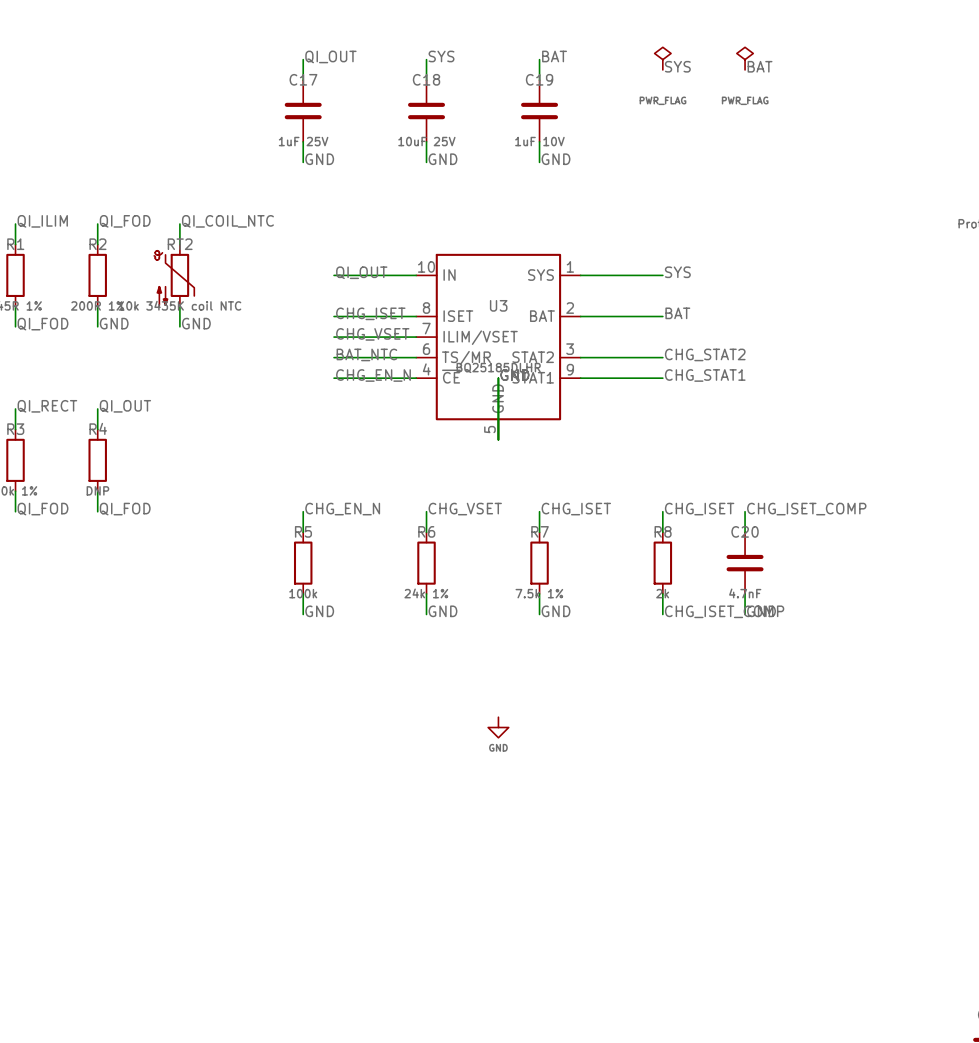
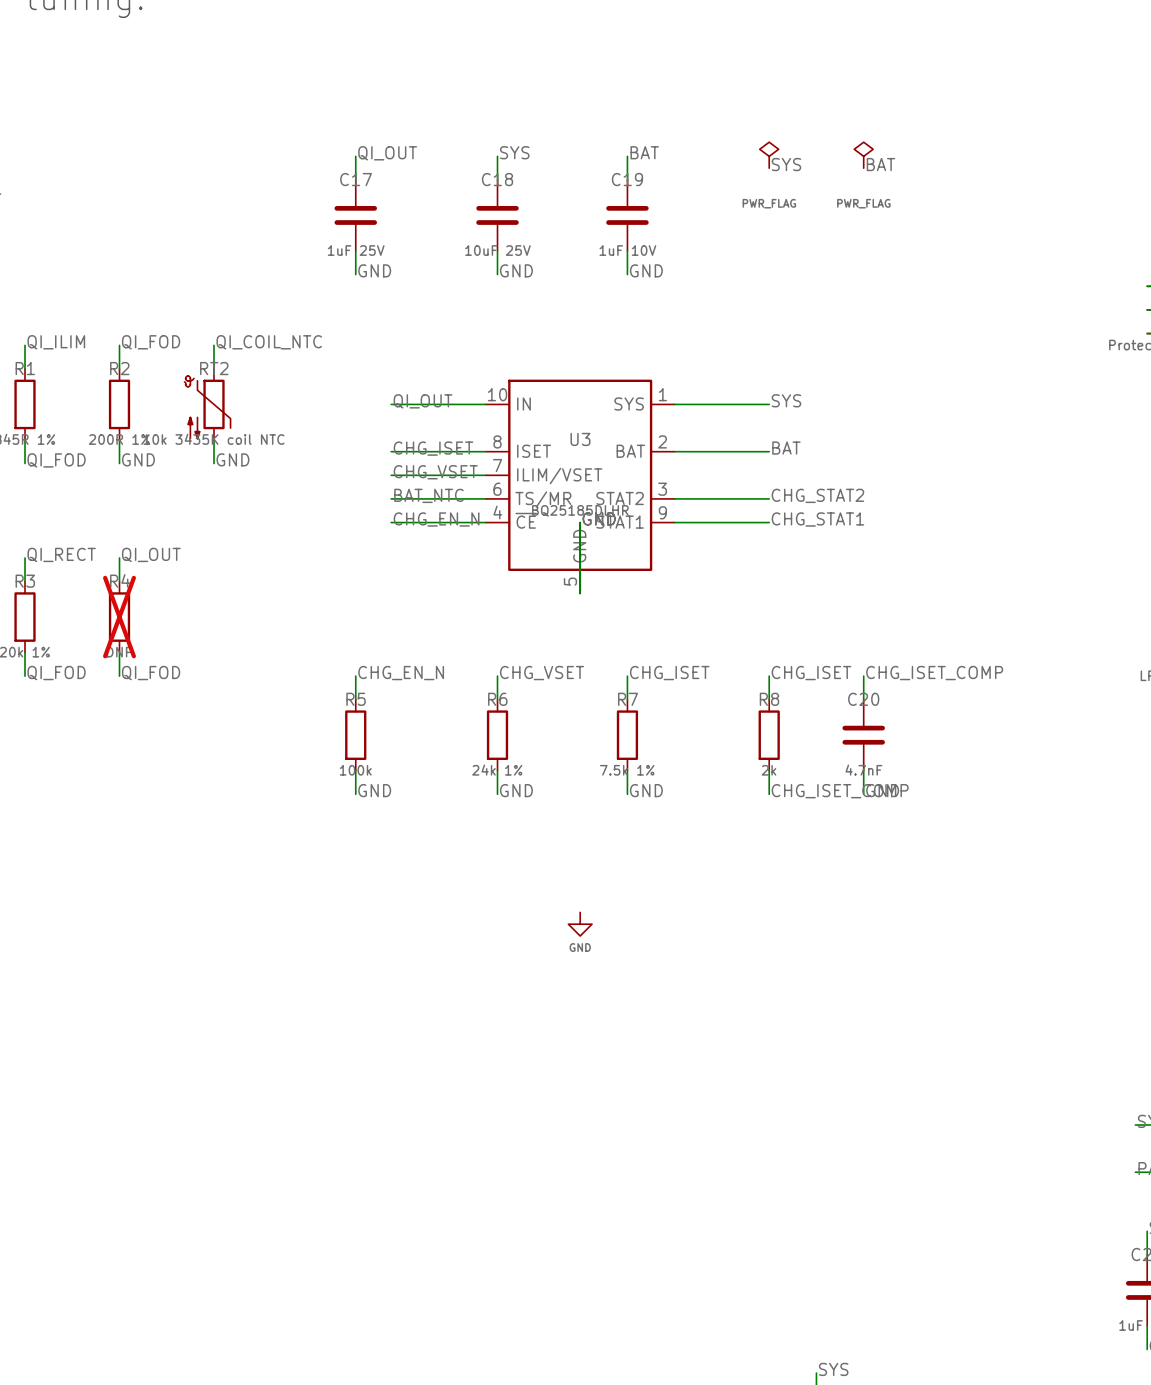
R4 do-not-place cross: none -> (119, 617)

